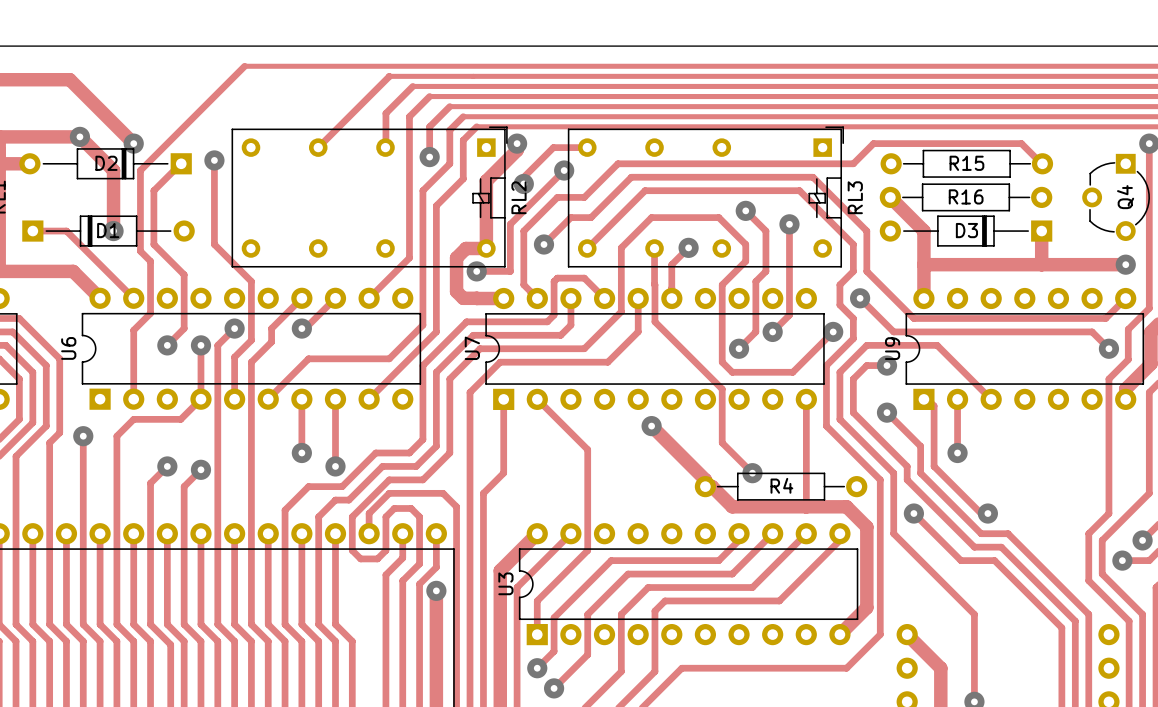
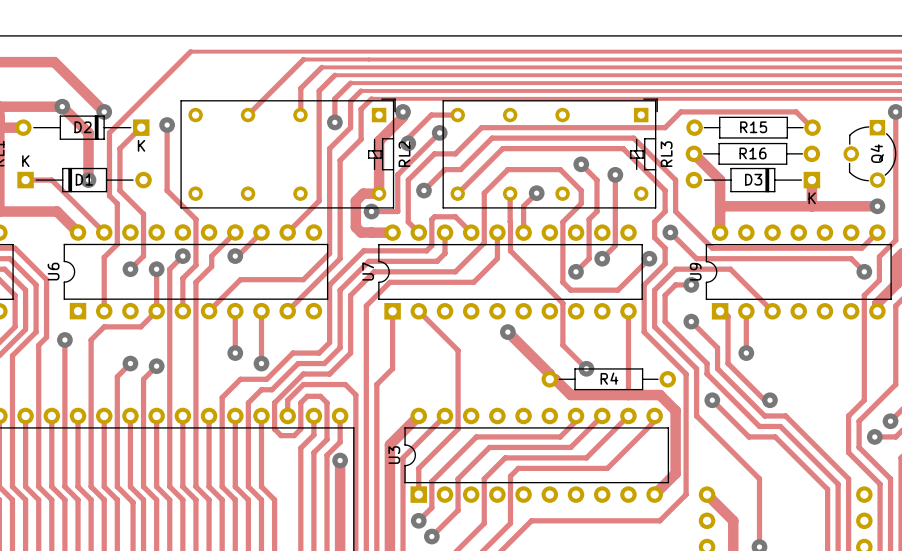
D2 text: none -> K (141, 145)
D1 text: none -> K (25, 161)
D3 text: none -> K (812, 198)

